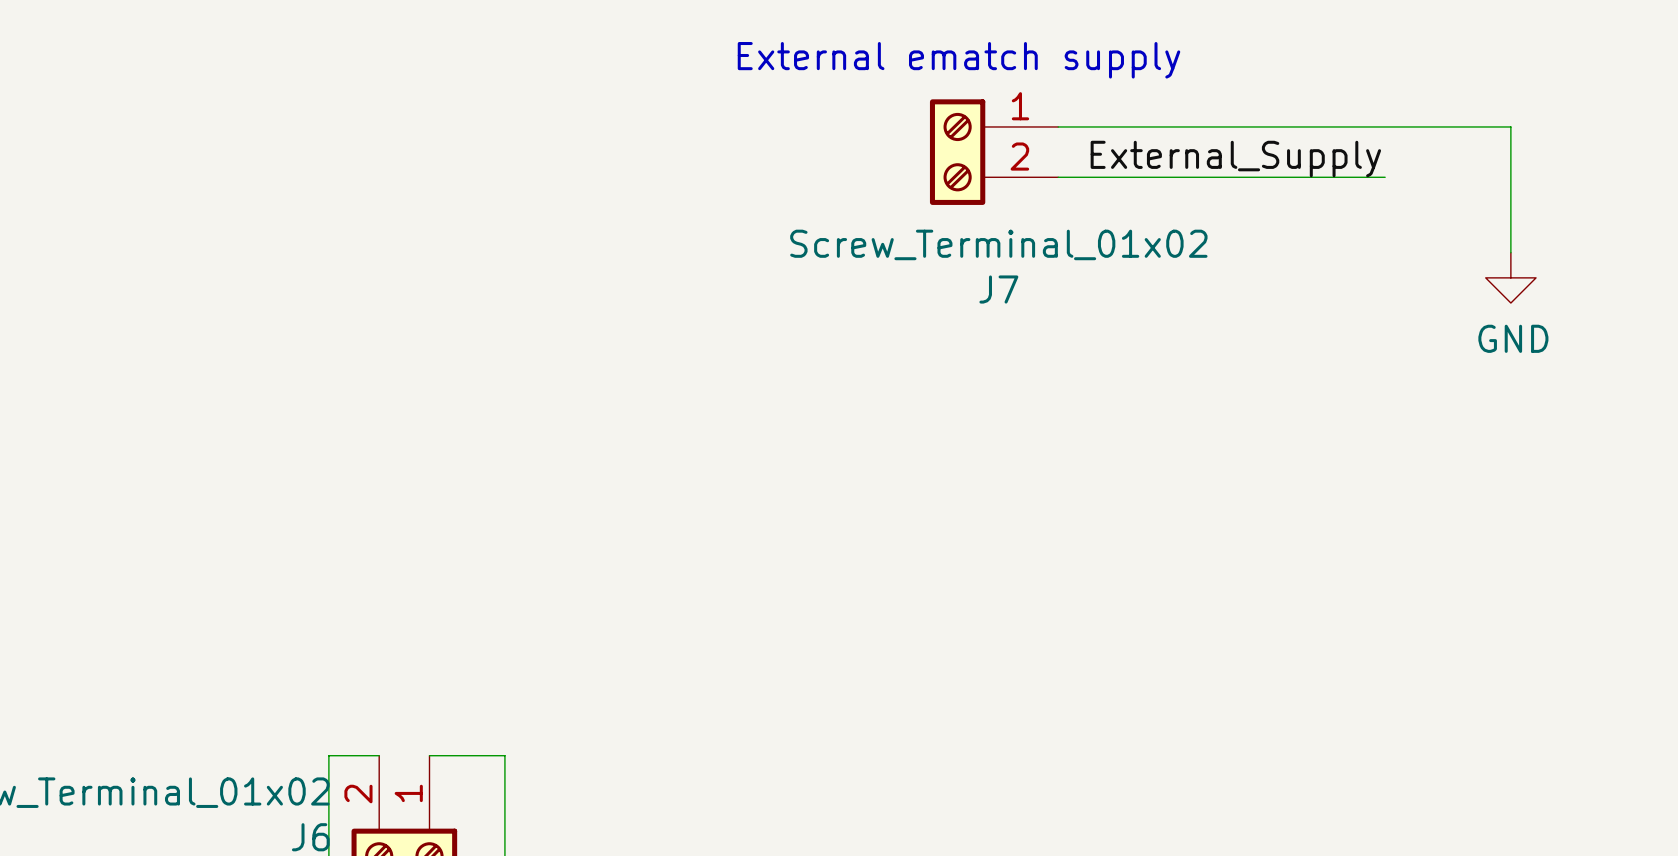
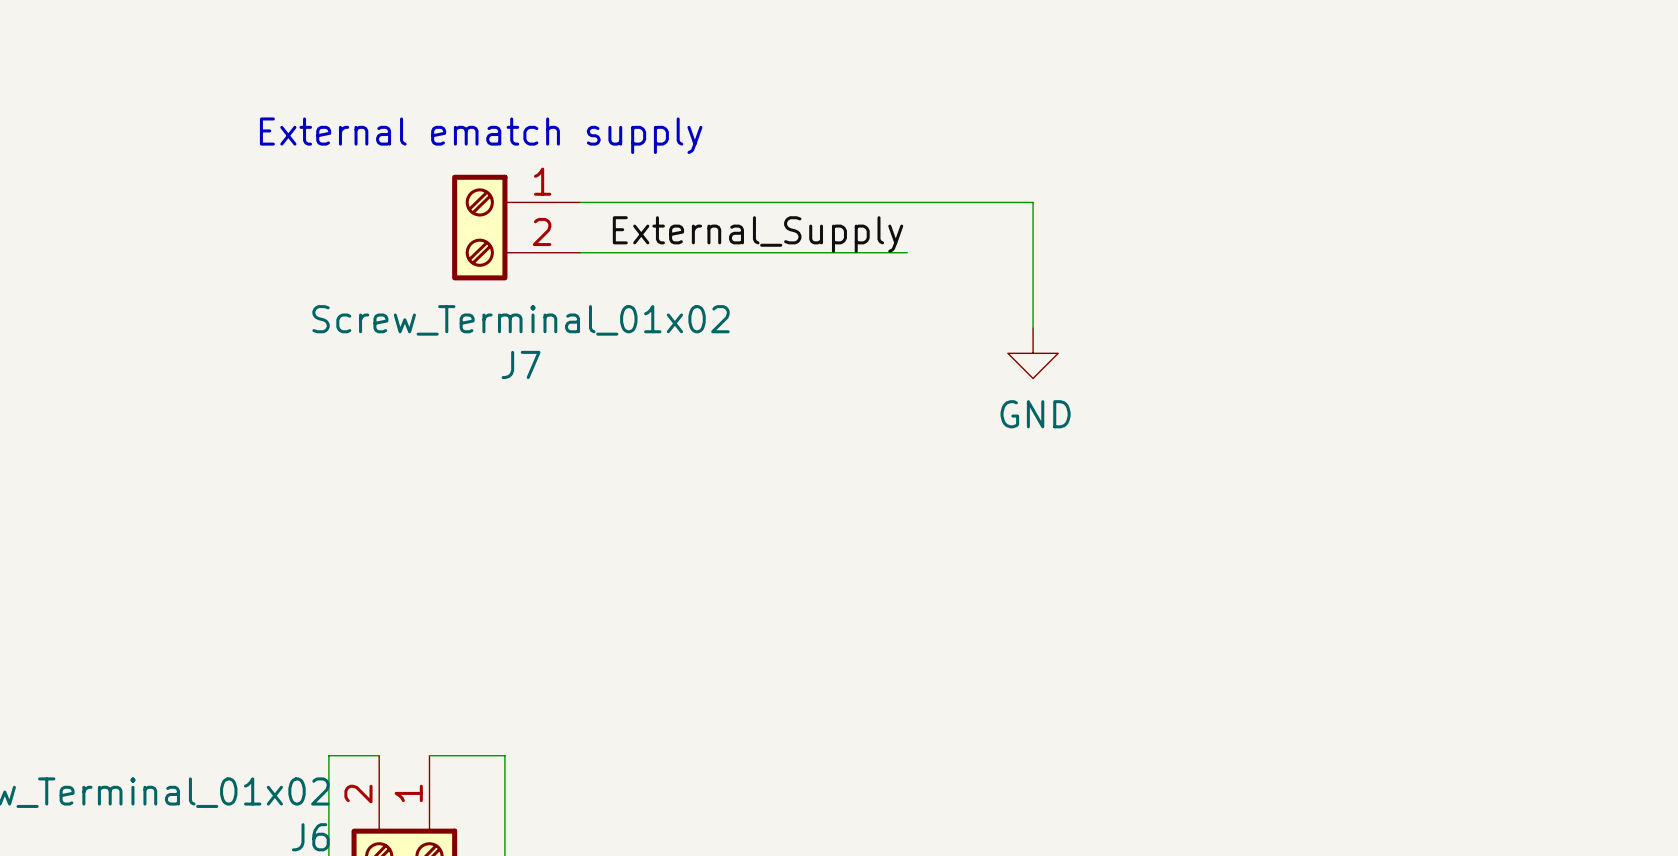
text position: External ematch supply (959, 60) -> External ematch supply (481, 135)
wire: (1058, 126) (1510, 126) (1510, 252) -> (580, 202) (1033, 202) (1033, 328)
J7 position: (994, 152) -> (516, 227)
label position: External_Supply (1235, 159) -> External_Supply (758, 234)
wire: (1058, 177) (1385, 177) -> (580, 252) (907, 252)
power symbol position: GND (1510, 277) -> GND (1033, 353)

